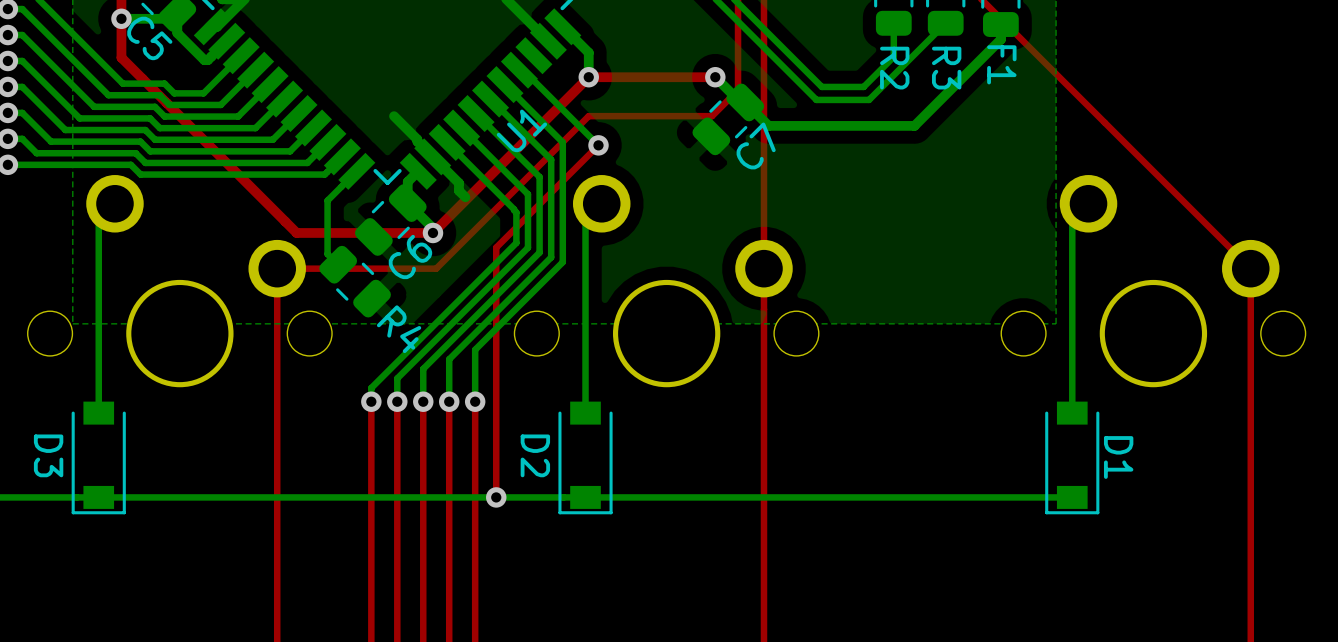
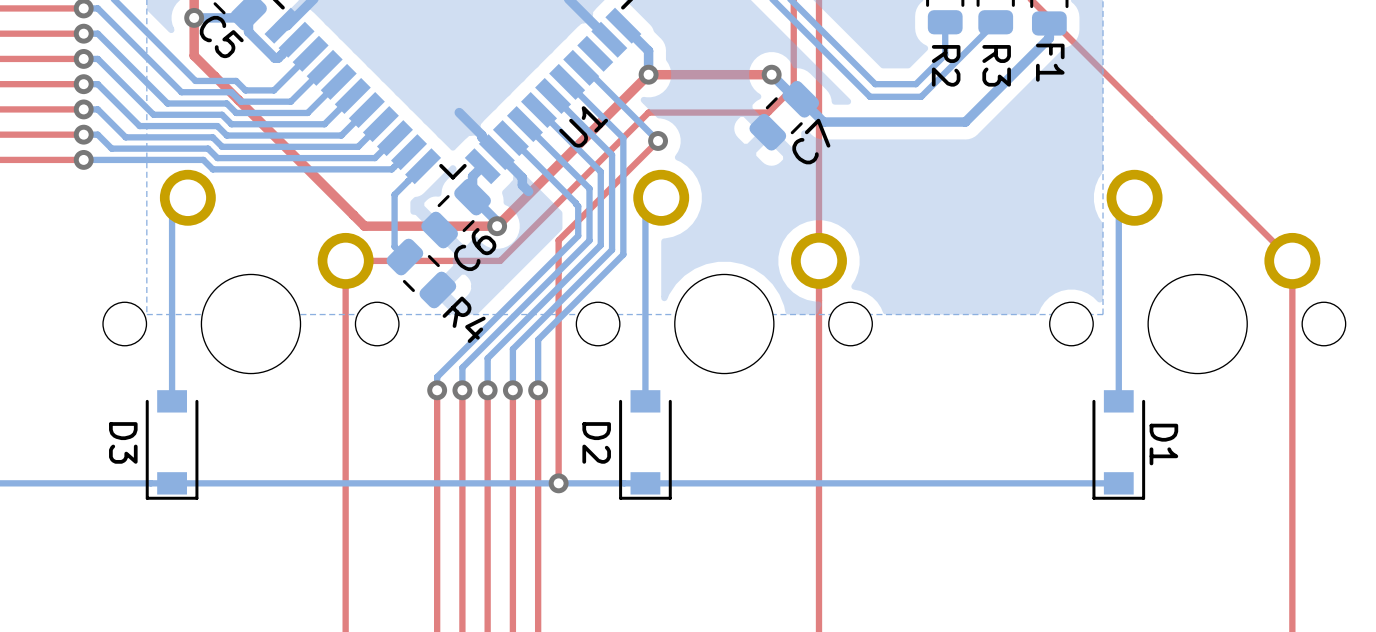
round board edge: [126, 279, 234, 388] -> none
round board edge: [612, 279, 721, 388] -> none
round board edge: [1099, 279, 1208, 388] -> none

